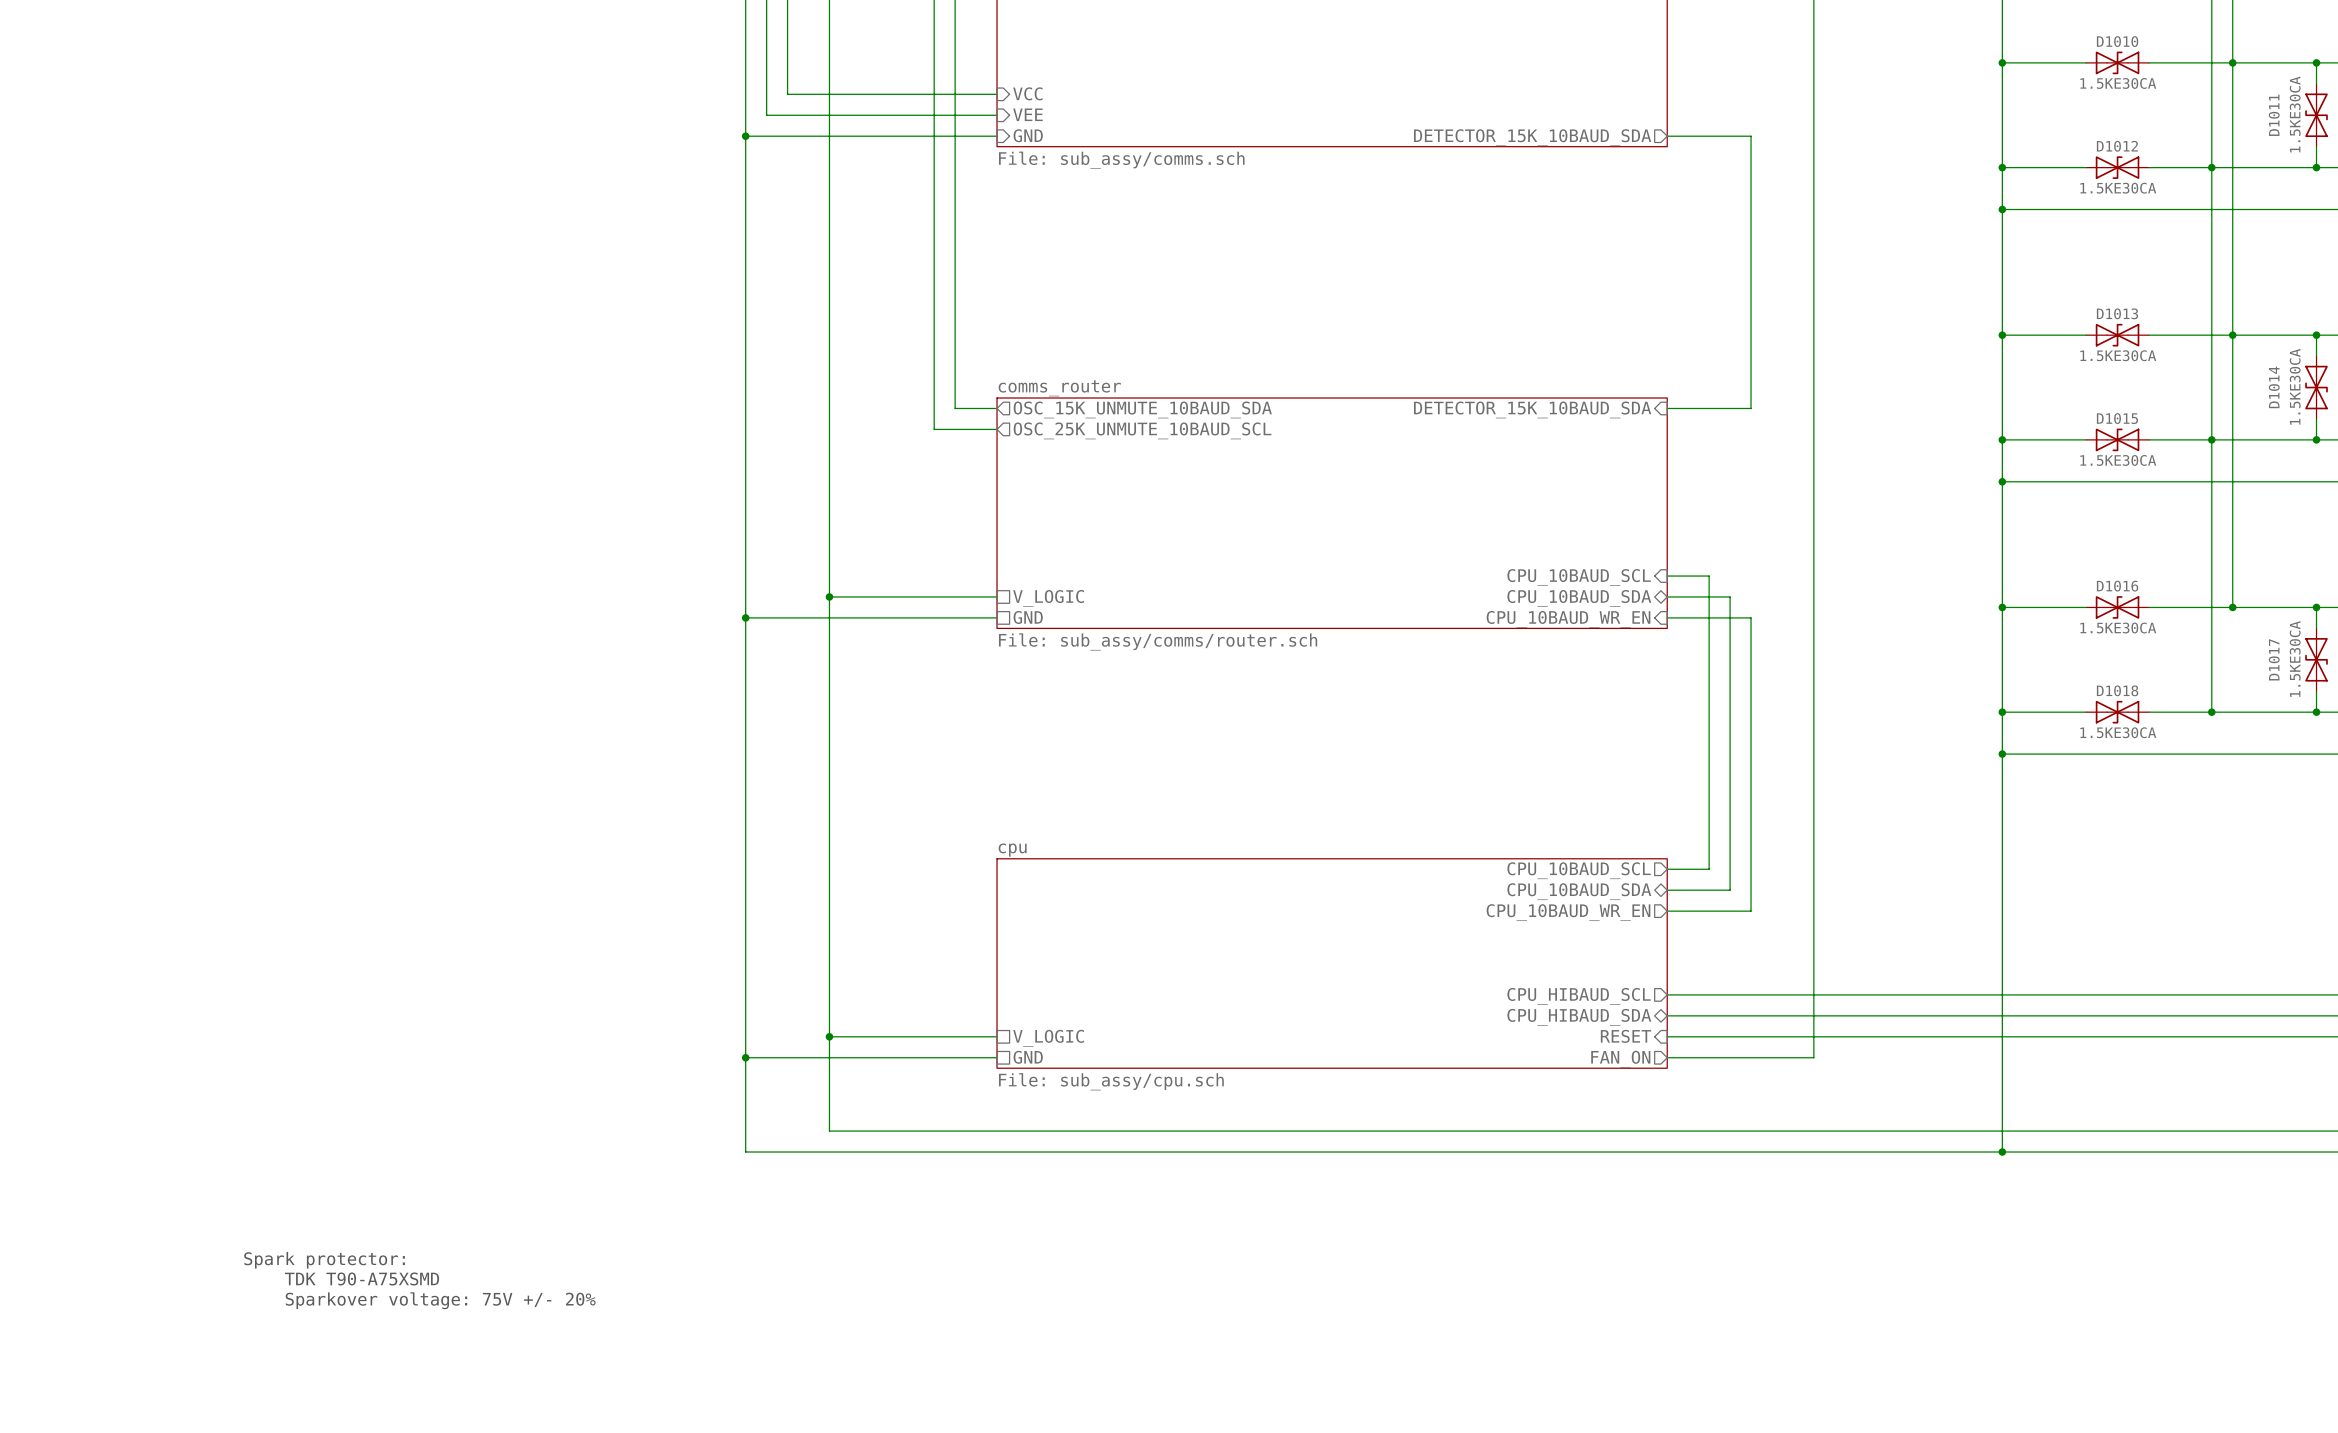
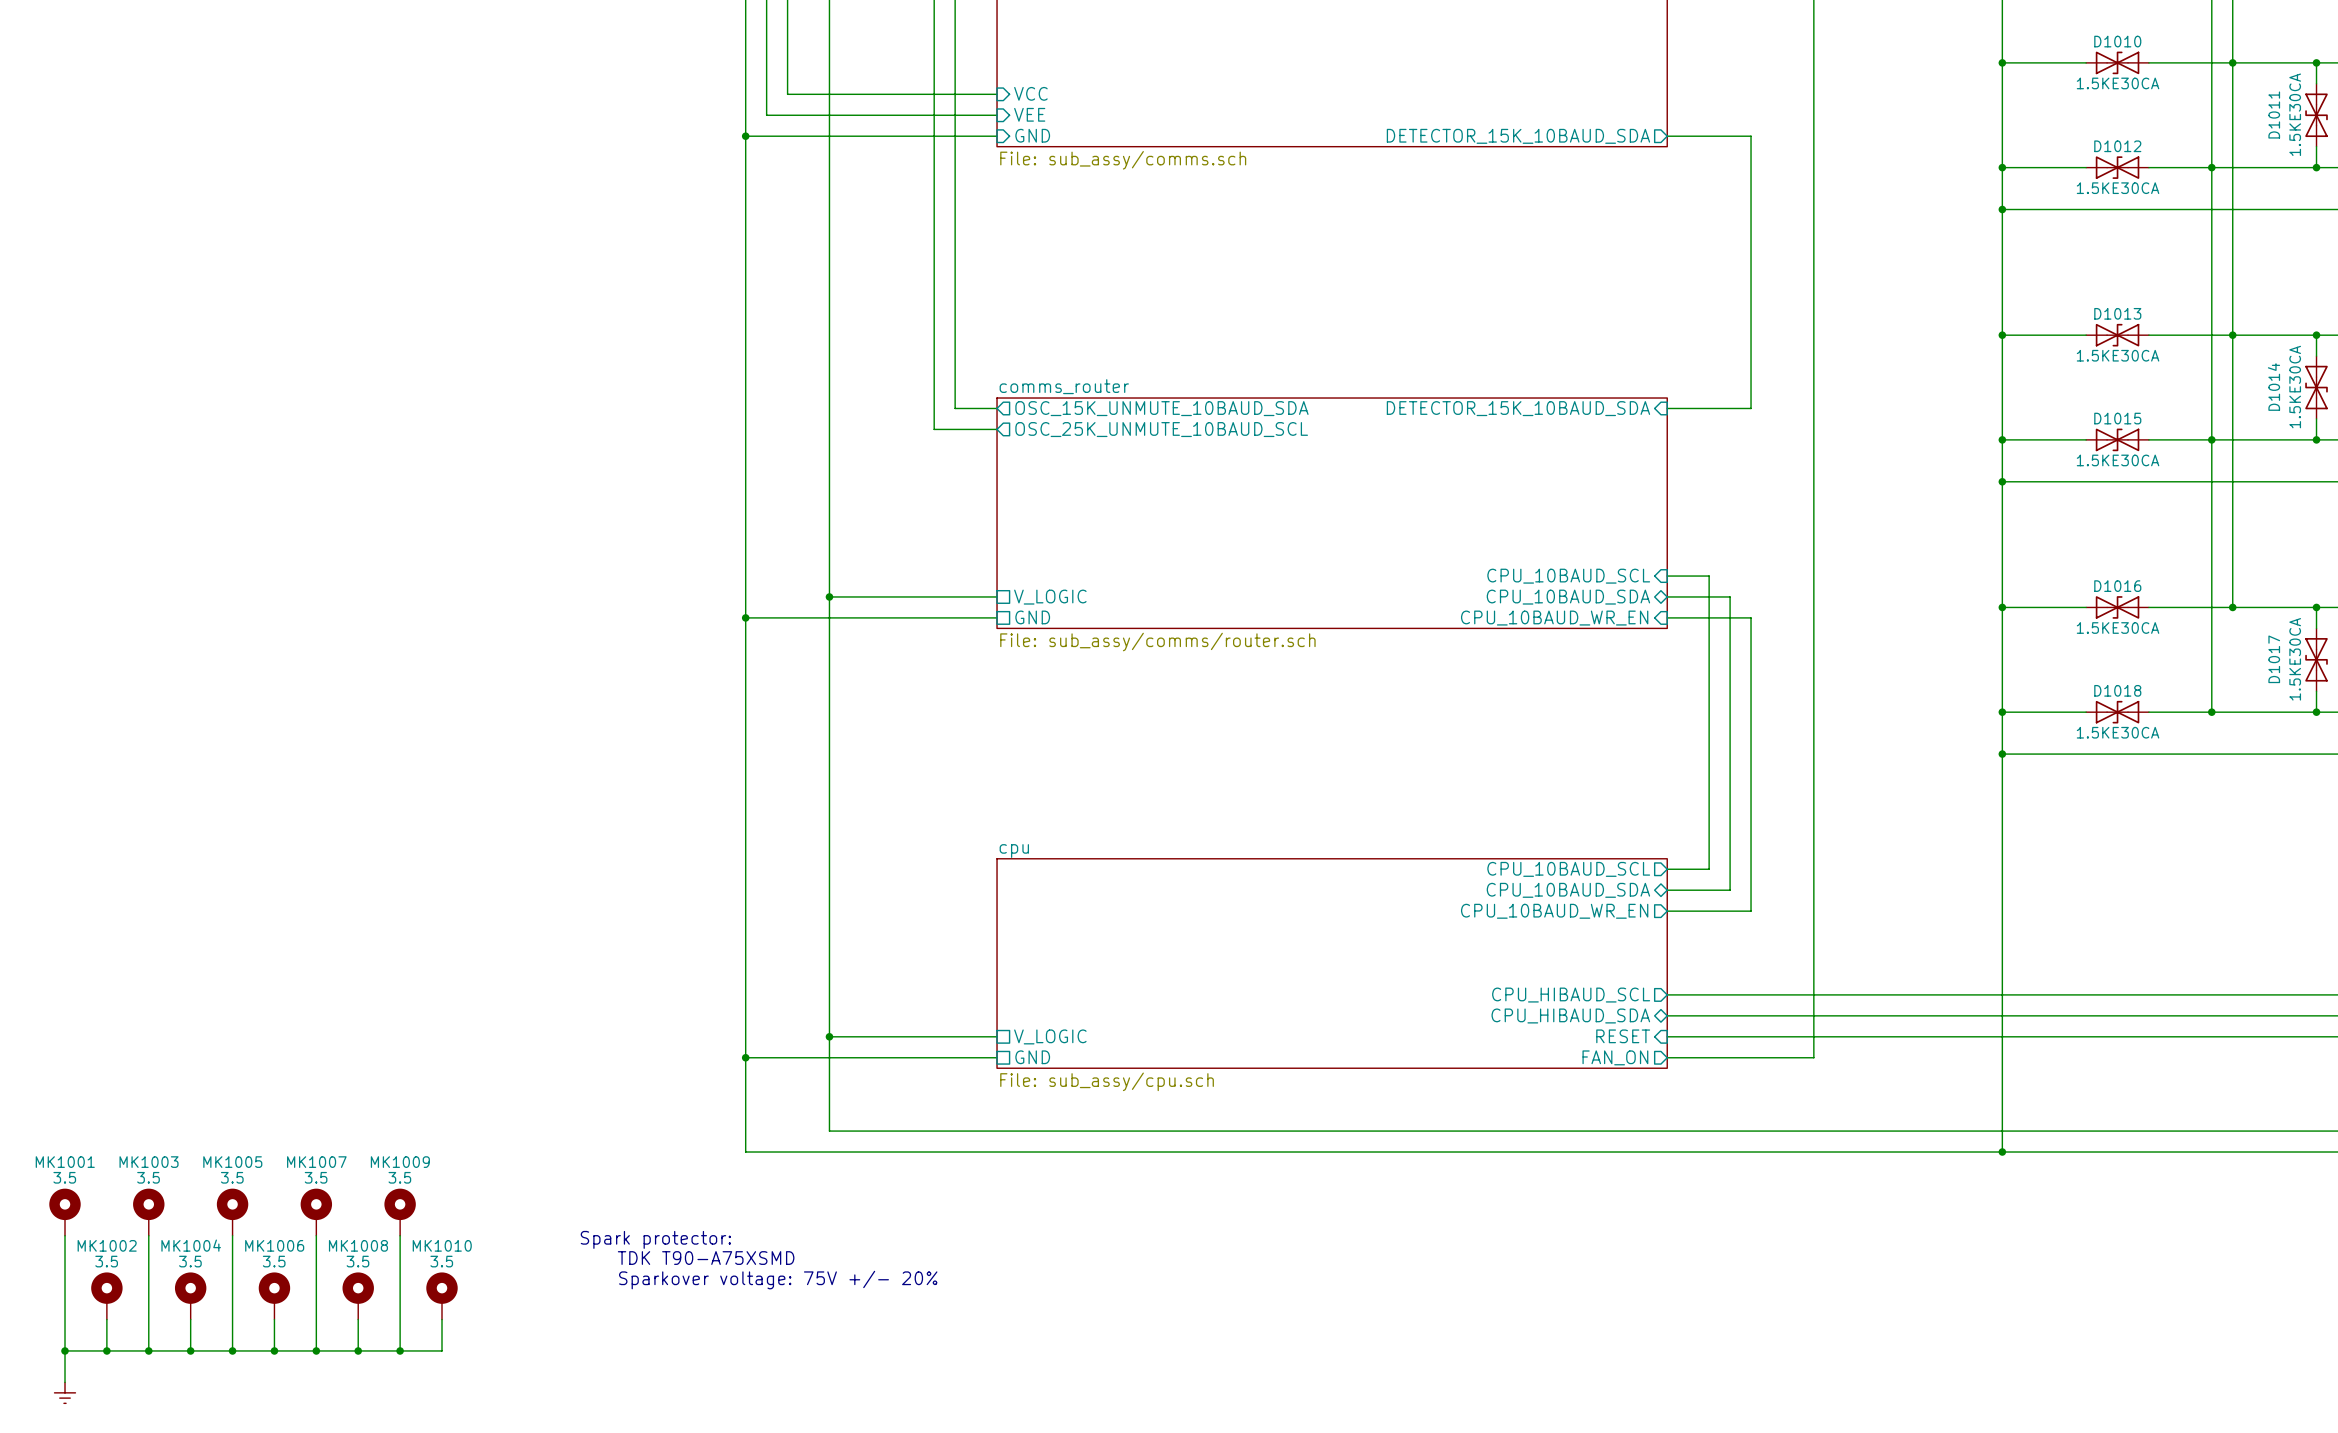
MK1001: none -> 3.5 (65, 1212)
MK1003: none -> 3.5 (148, 1212)
MK1005: none -> 3.5 (232, 1212)
MK1007: none -> 3.5 (316, 1212)
MK1009: none -> 3.5 (400, 1212)
wire: none -> (65, 1235) (65, 1382)
wire: none -> (148, 1235) (148, 1350)
wire: none -> (232, 1235) (232, 1350)
wire: none -> (316, 1235) (316, 1350)
wire: none -> (400, 1235) (400, 1350)
text: none -> Spark protector: (655, 1239)
text: none -> TDK T90-A75XSMD (706, 1258)
text: Spark protector: (324, 1260) -> none
text: TDK T90-A75XSMD (362, 1278) -> none
text: none -> Sparkover voltage: 75V +/- 20% (778, 1280)
MK1002: none -> 3.5 (106, 1295)
MK1004: none -> 3.5 (190, 1295)
MK1006: none -> 3.5 (274, 1295)
MK1008: none -> 3.5 (358, 1295)
MK1010: none -> 3.5 (442, 1295)
text: Sparkover voltage: 75V +/- 20% (440, 1300) -> none
wire: none -> (106, 1319) (106, 1350)
wire: none -> (190, 1319) (190, 1350)
wire: none -> (274, 1319) (274, 1350)
wire: none -> (358, 1319) (358, 1350)
wire: none -> (442, 1319) (442, 1350) (65, 1350)
junction: none -> (65, 1350)
junction: none -> (106, 1350)
junction: none -> (148, 1350)
junction: none -> (190, 1350)
junction: none -> (232, 1350)
junction: none -> (274, 1350)
junction: none -> (316, 1350)
junction: none -> (358, 1350)
junction: none -> (400, 1350)
power symbol: none -> (65, 1392)

